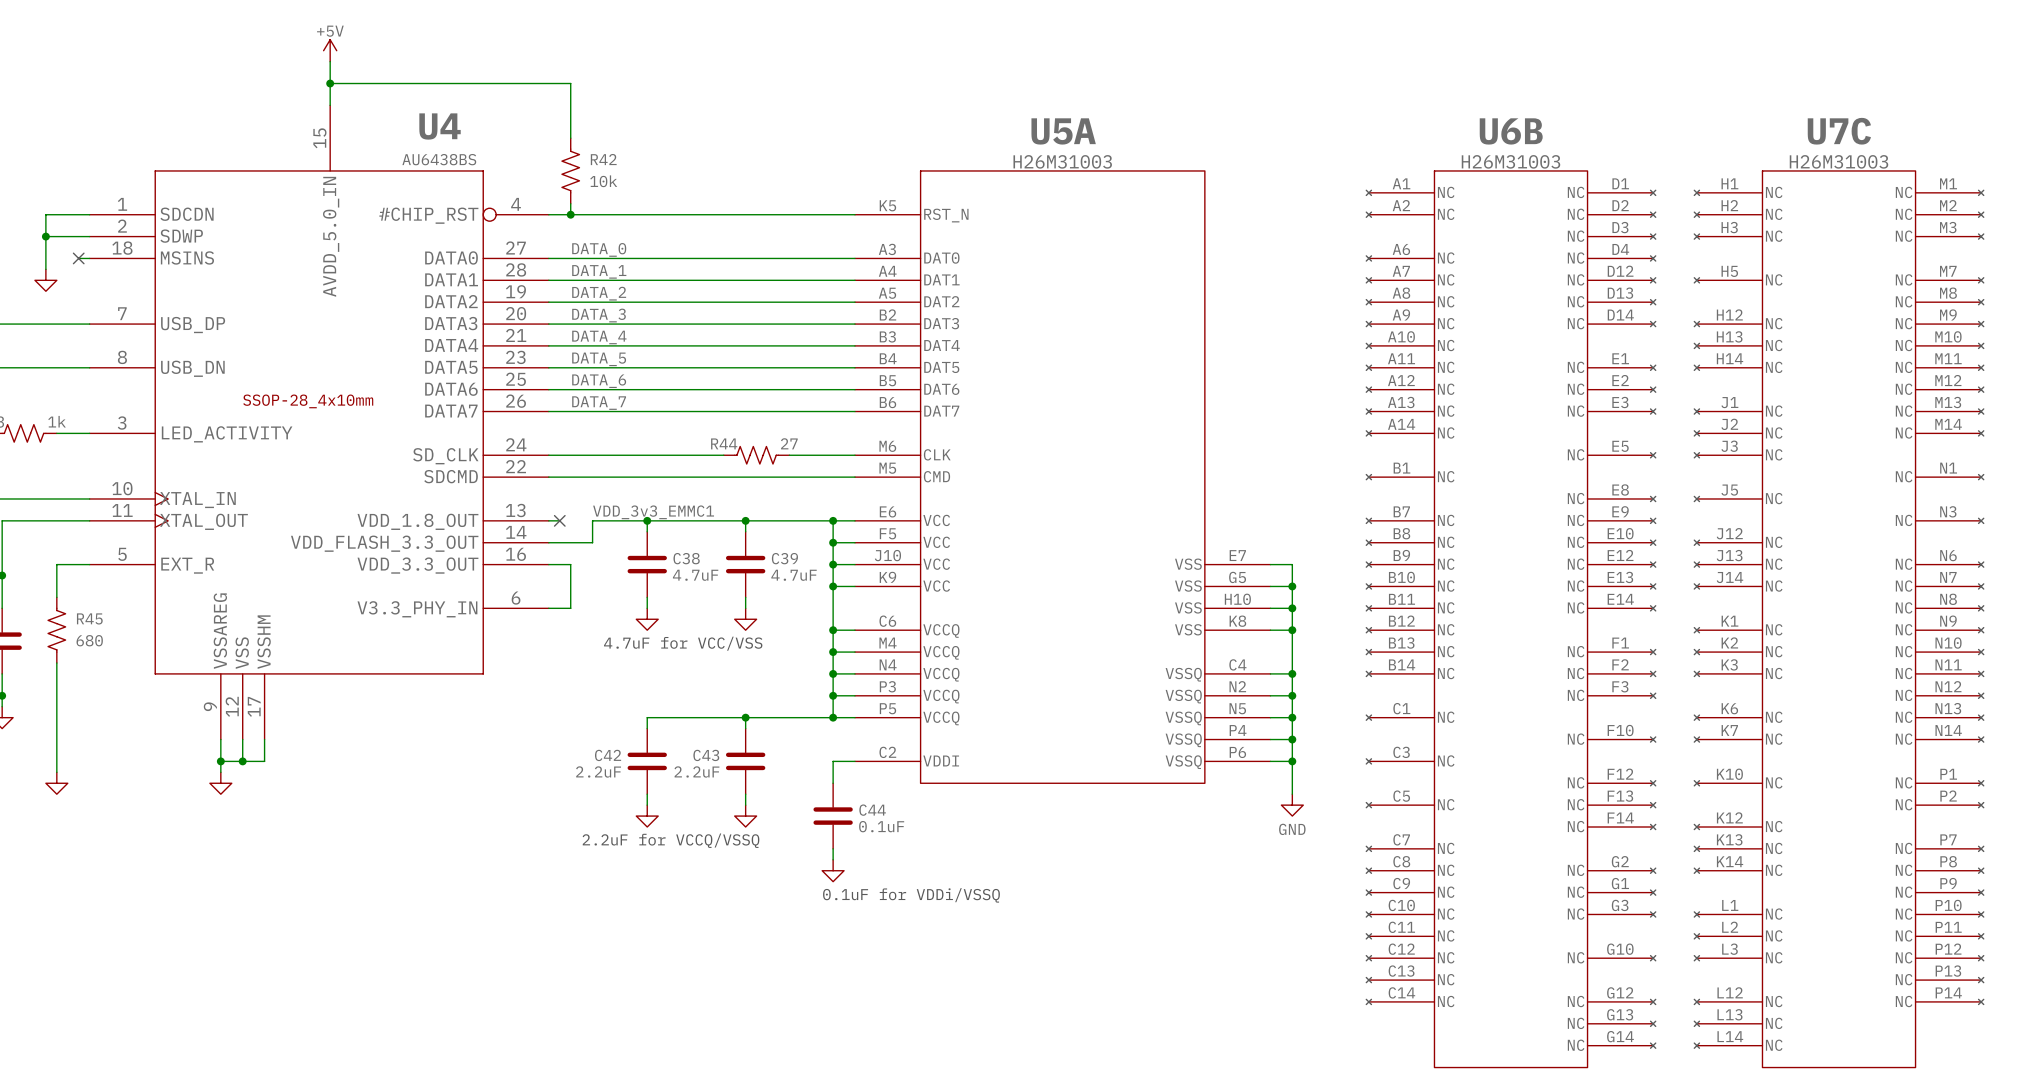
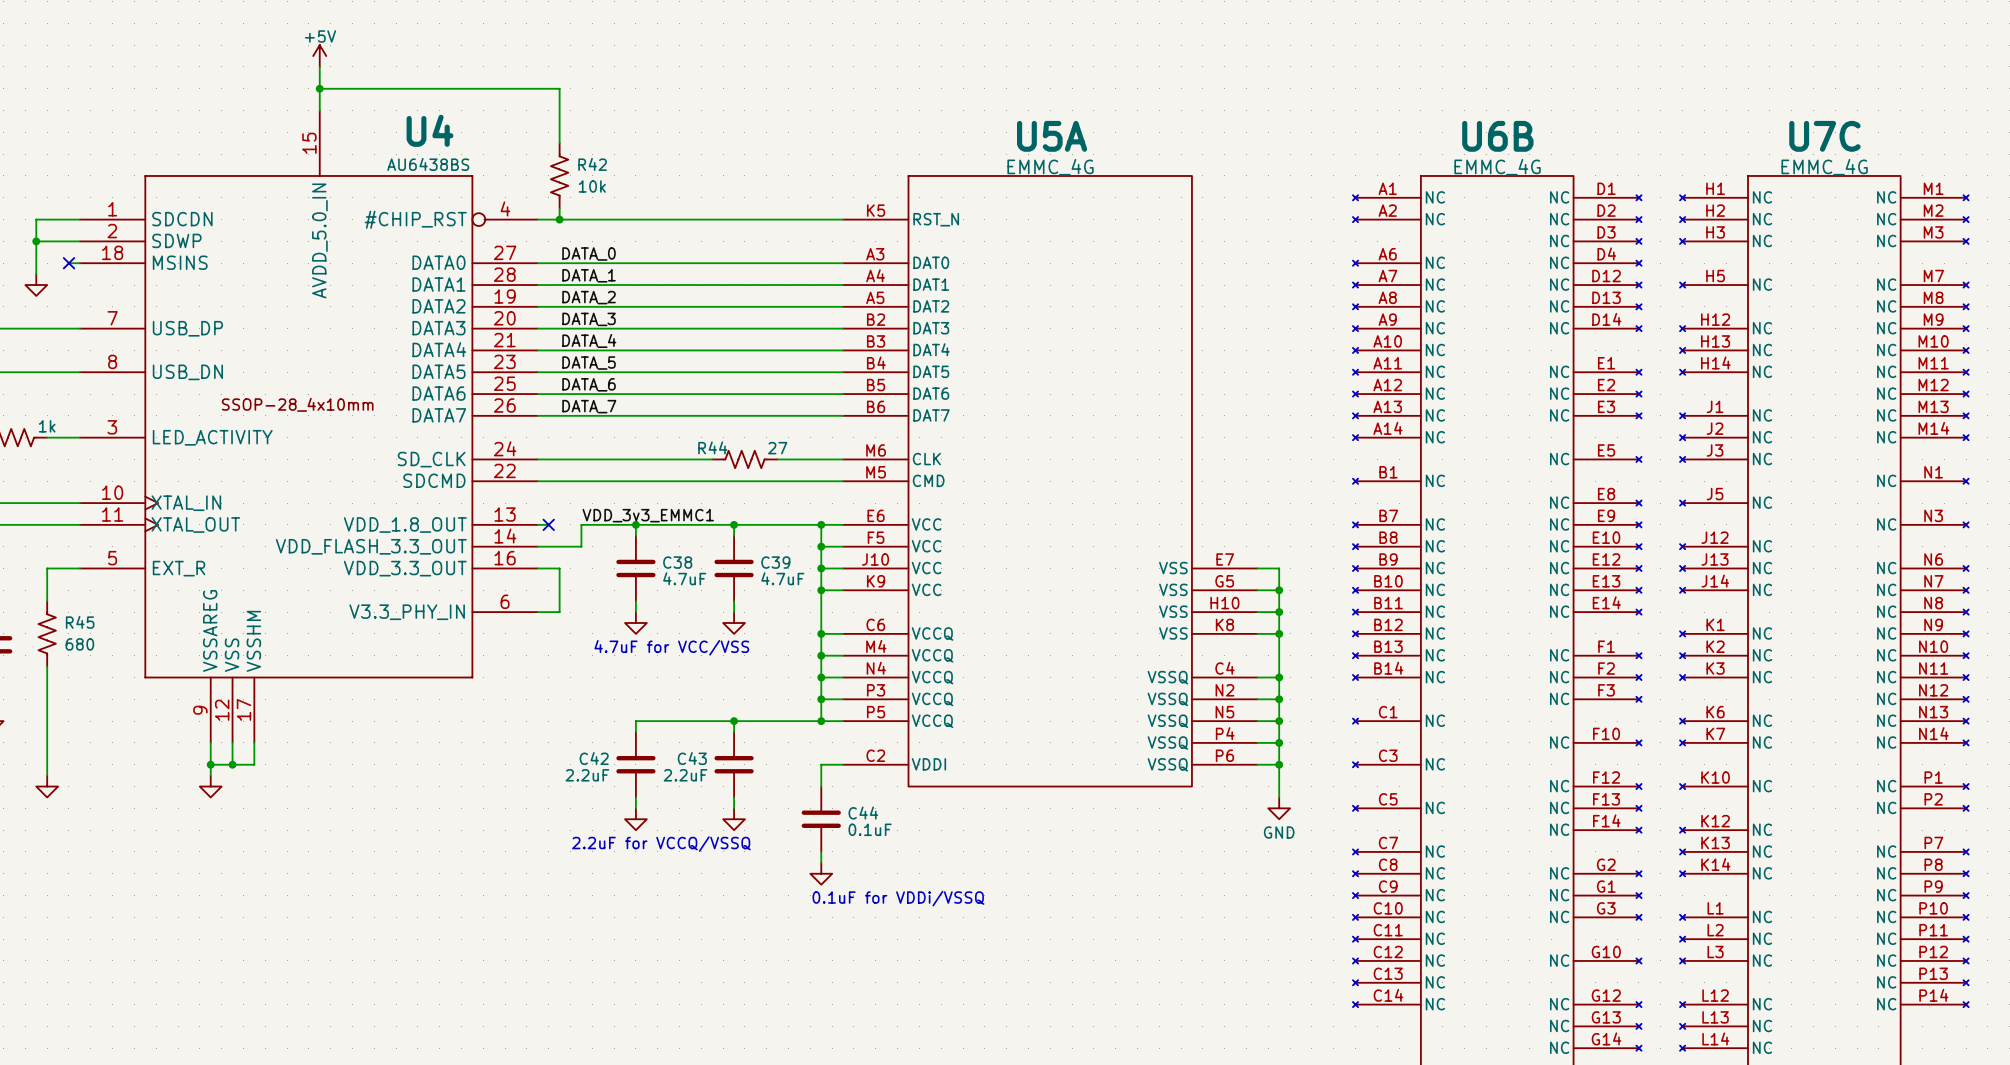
U5A value: H26M31003 (1062, 161) -> EMMC_4G (1050, 167)
U6B value: H26M31003 (1510, 161) -> EMMC_4G (1497, 167)
U7C value: H26M31003 (1838, 161) -> EMMC_4G (1824, 167)

